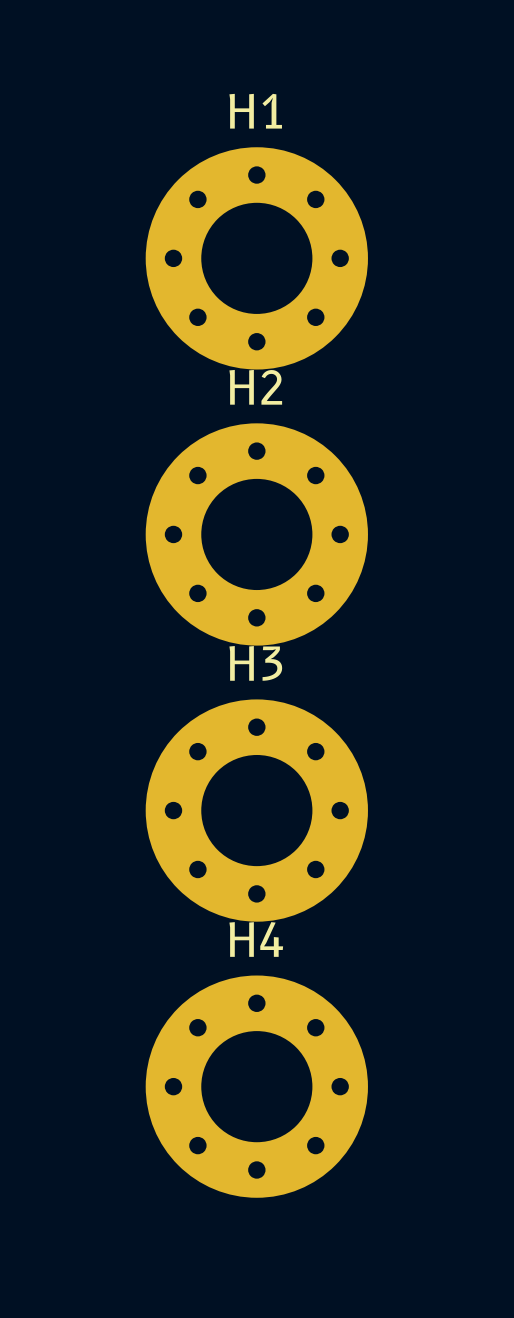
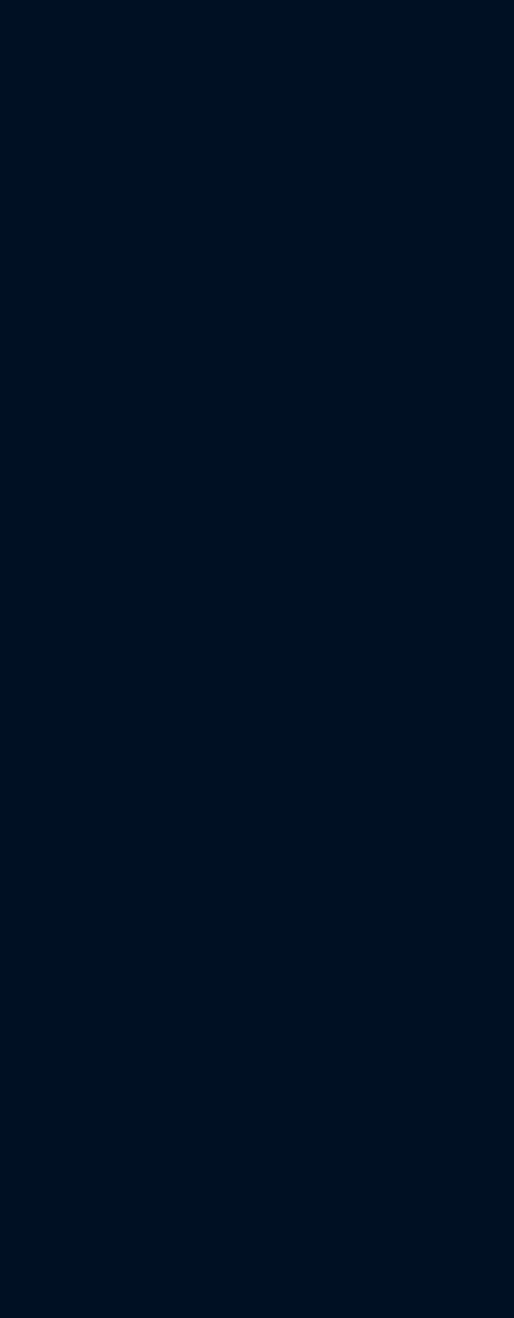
H1: (256, 258) -> none
H2: (256, 534) -> none
H3: (256, 810) -> none
H4: (256, 1086) -> none

